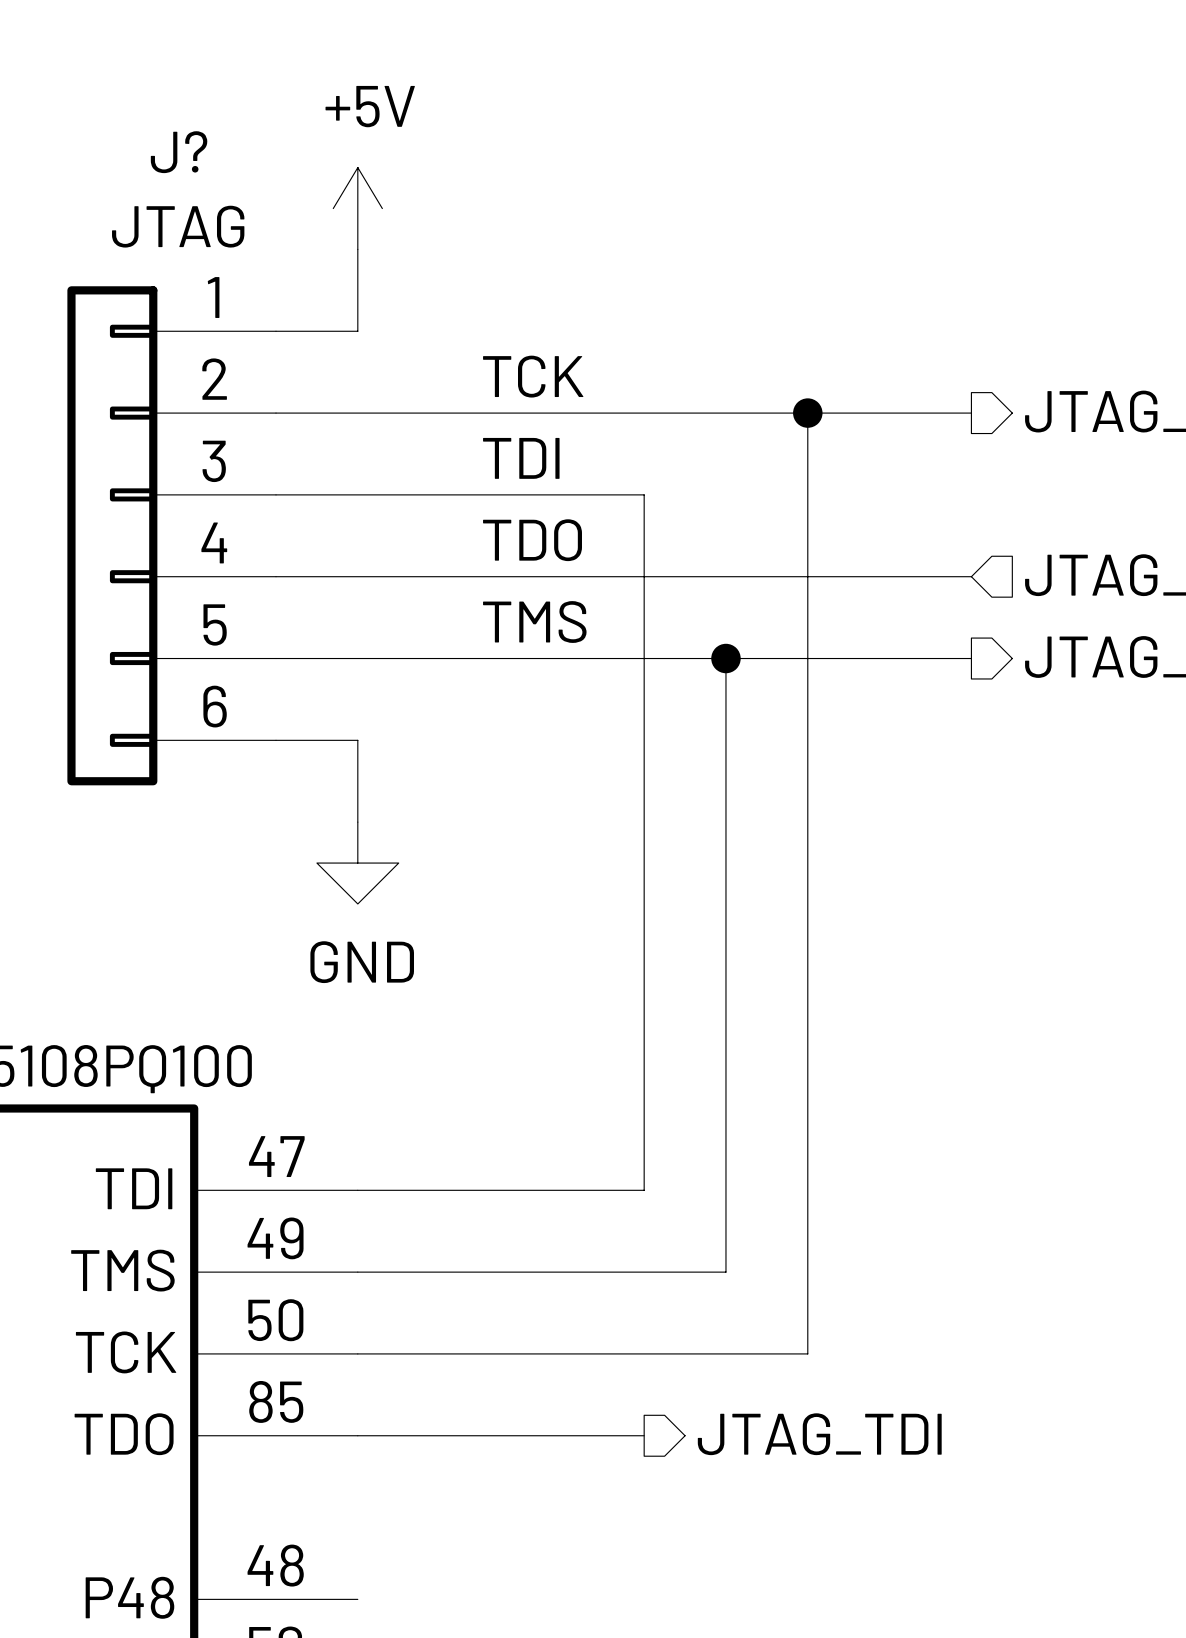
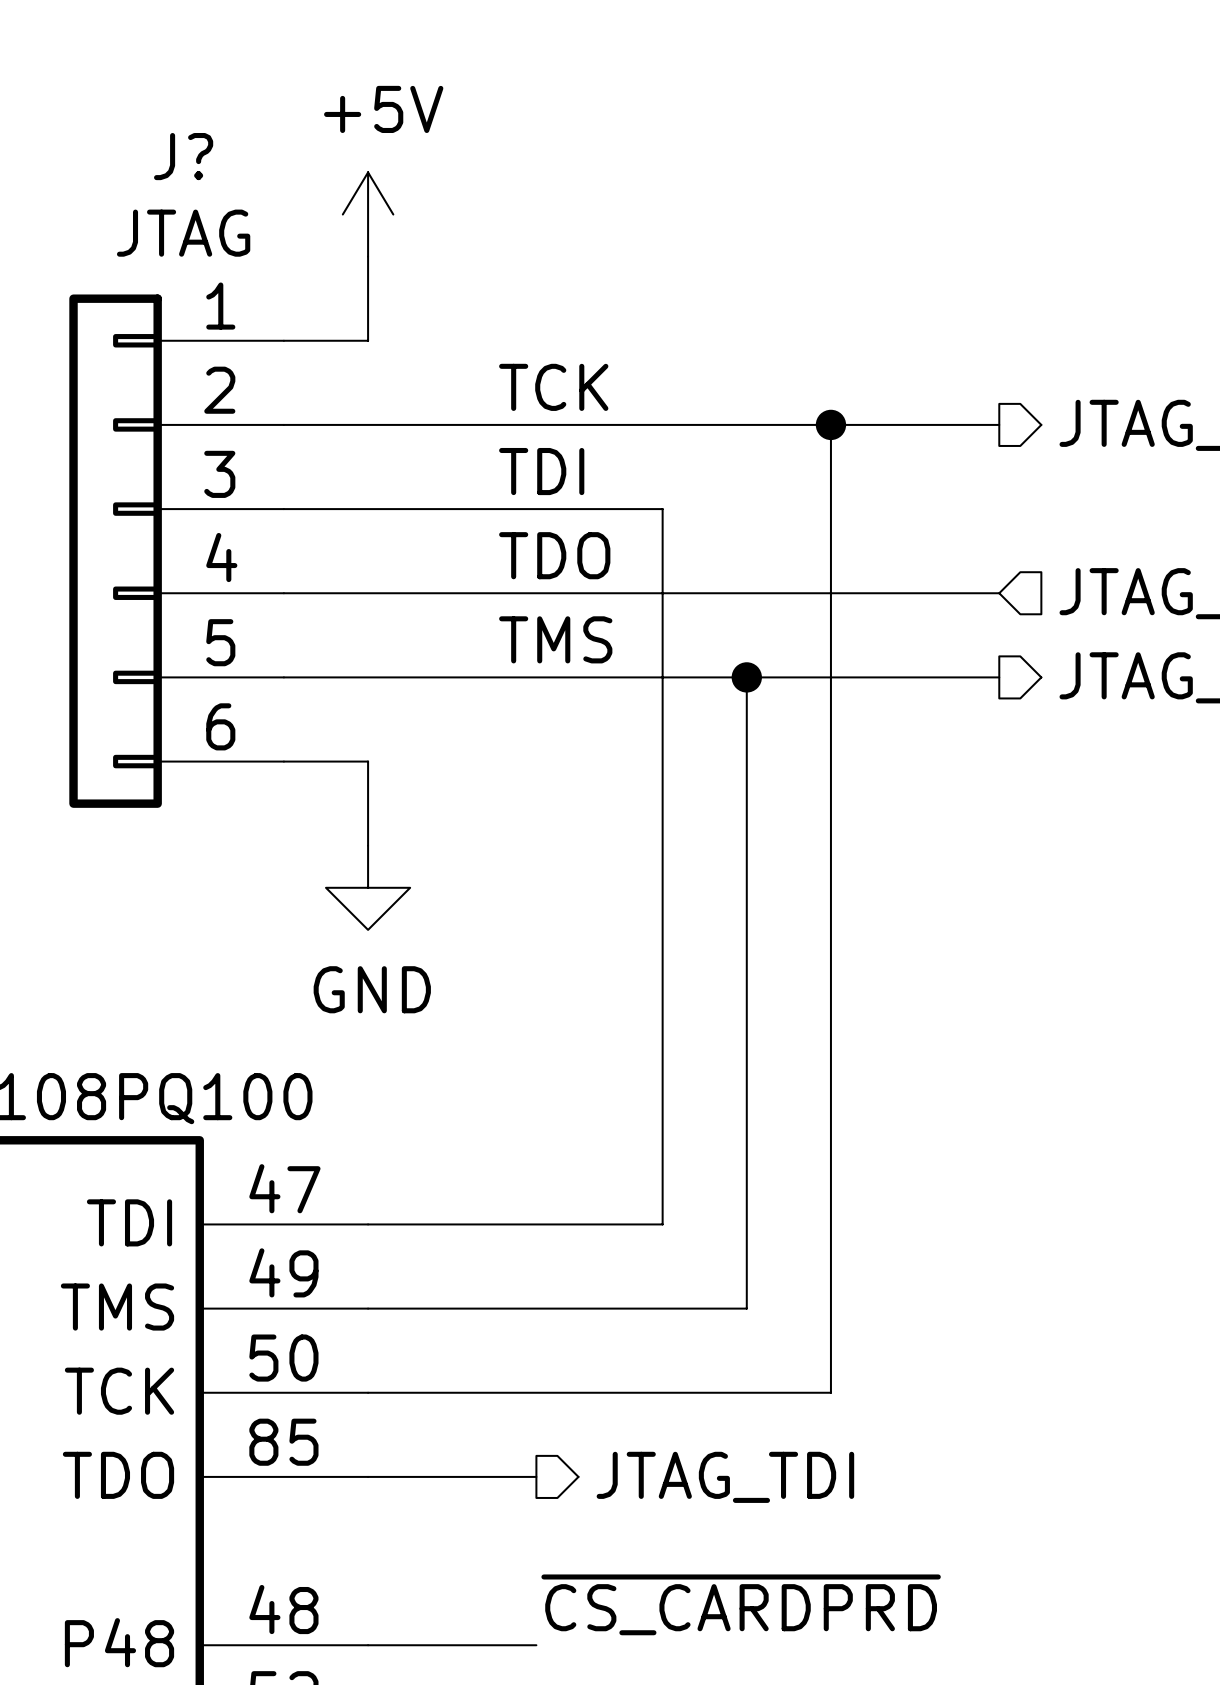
hierarchical label position: JTAG_TDI (819, 1434) -> JTAG_TDI (725, 1477)
wire: (521, 1435) (644, 1435) -> none
label: none -> ~{CS_CARDPRD} (741, 1604)
wire: none -> (368, 1645) (536, 1645)

